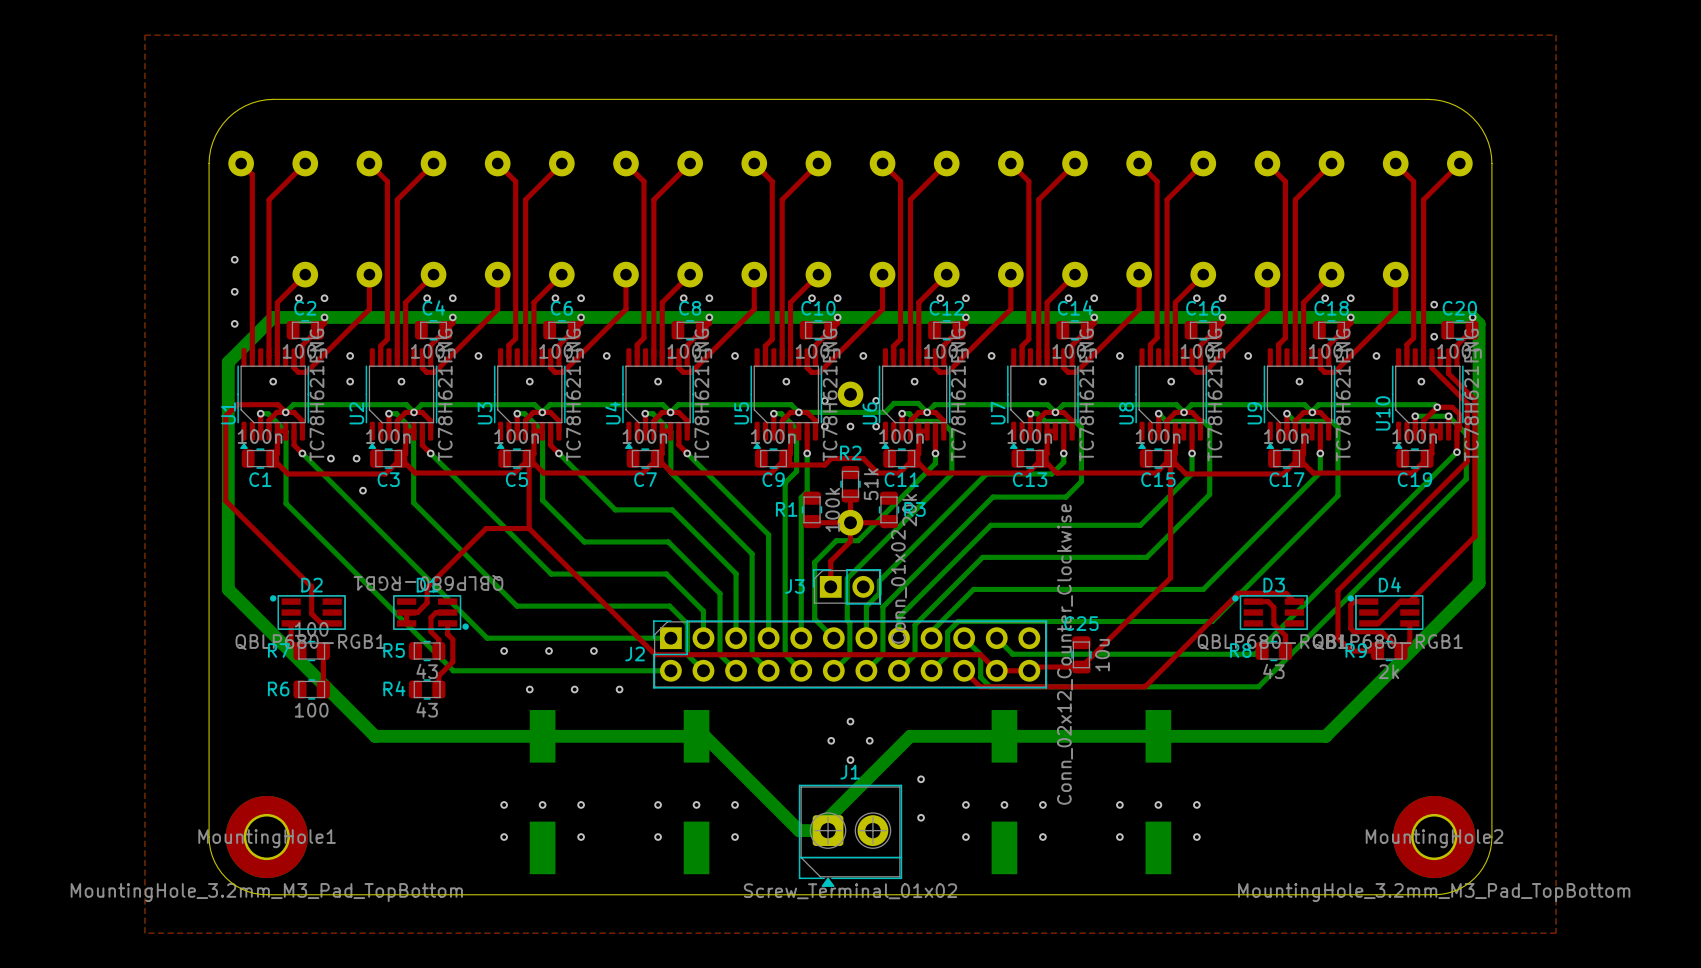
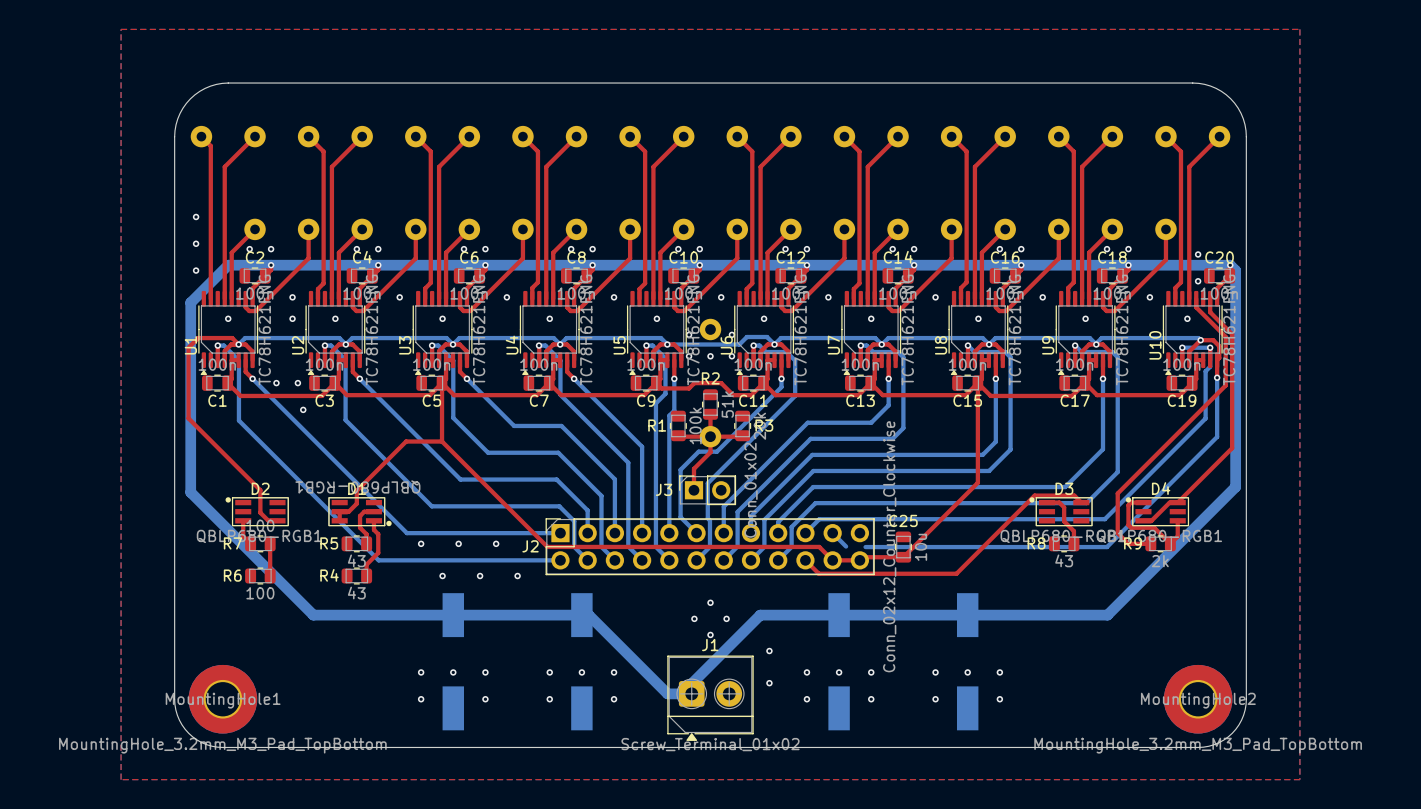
bottom track: (1448, 416) (1466, 433) (1466, 479) (1258, 686) (990, 686) (980, 677) (980, 654) (964, 638) -> none
bottom track: (1456, 452) (1254, 654) (1012, 654) -> (1217, 377) (1217, 436) (1107, 547) (865, 547)
bottom track: (1063, 462) (1051, 473) (986, 473) (879, 581) (879, 593) -> (888, 386) (888, 405) (871, 422) (807, 422) (734, 495)
bottom track: (1320, 472) (1203, 589) (973, 589) (931, 631) -> (1103, 394) (1103, 449) (1065, 487) (813, 487) (778, 522) (778, 527)
bottom track: (1192, 473) (1140, 525) (1068, 525) -> (903, 402) (903, 428) (892, 438)
bottom track: none -> (995, 395) (995, 441) (982, 454) (812, 454) (751, 516)
bottom track: (1081, 481) (1066, 497) (992, 497) (882, 607) (882, 612) -> none
bottom track: (1209, 494) (1146, 557) (982, 557) (915, 624) -> (1010, 413) (1010, 449) (989, 470) (813, 470) (764, 522)
bottom track: (1337, 495) (1212, 621) -> (1210, 350) (1210, 366) (1205, 371) (1205, 418) (1104, 519) (1012, 519)
bottom track: none -> (1117, 414) (1117, 472) (1086, 503) (815, 503) (791, 527)
bottom track: (990, 525) (898, 617) -> (827, 438) (810, 438) (737, 511)
bottom track: (980, 621) (958, 621) (947, 632) -> (819, 519) (805, 533)

